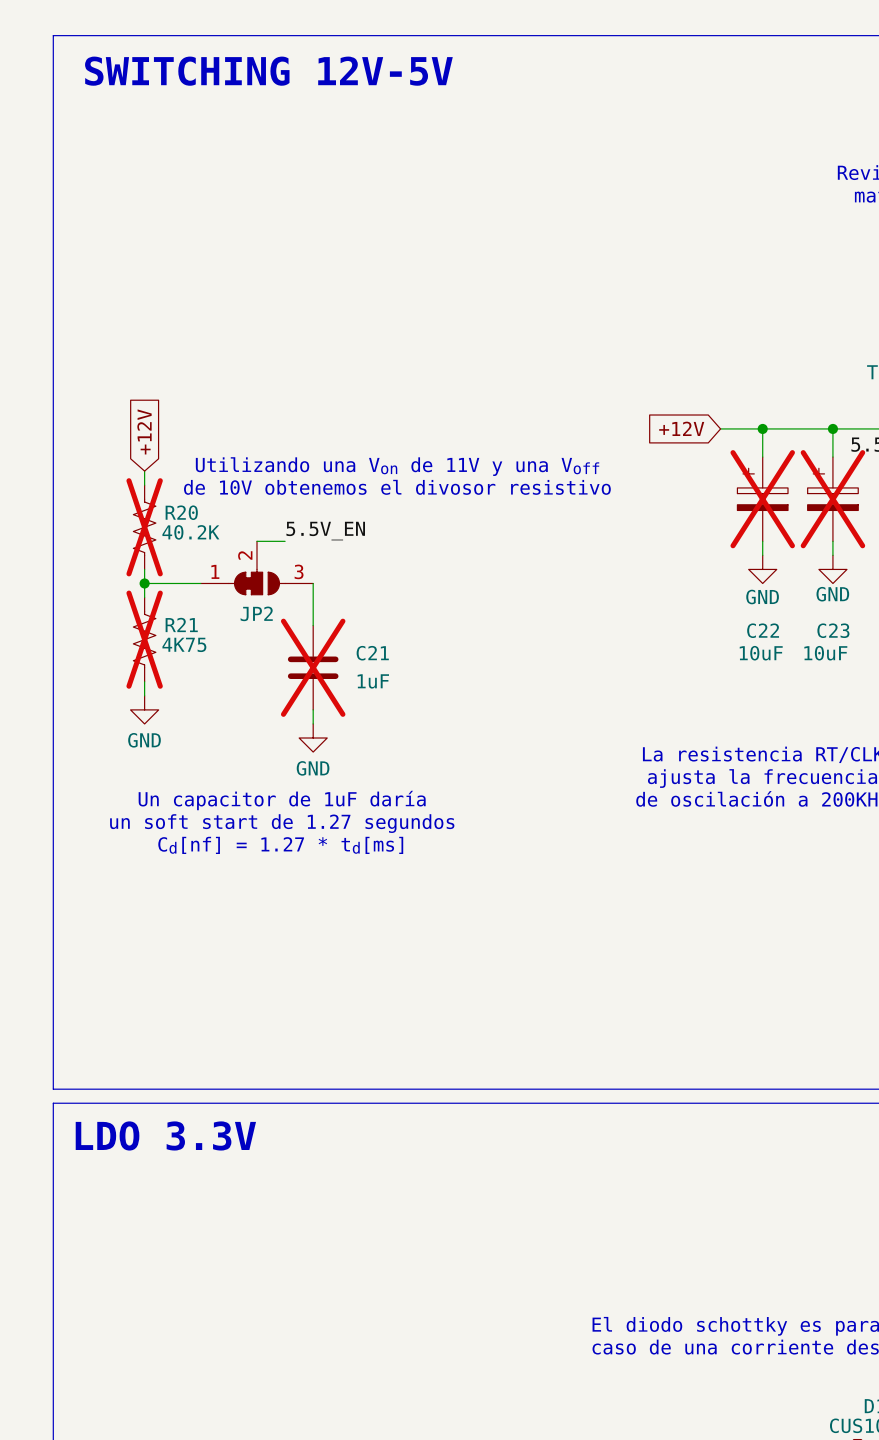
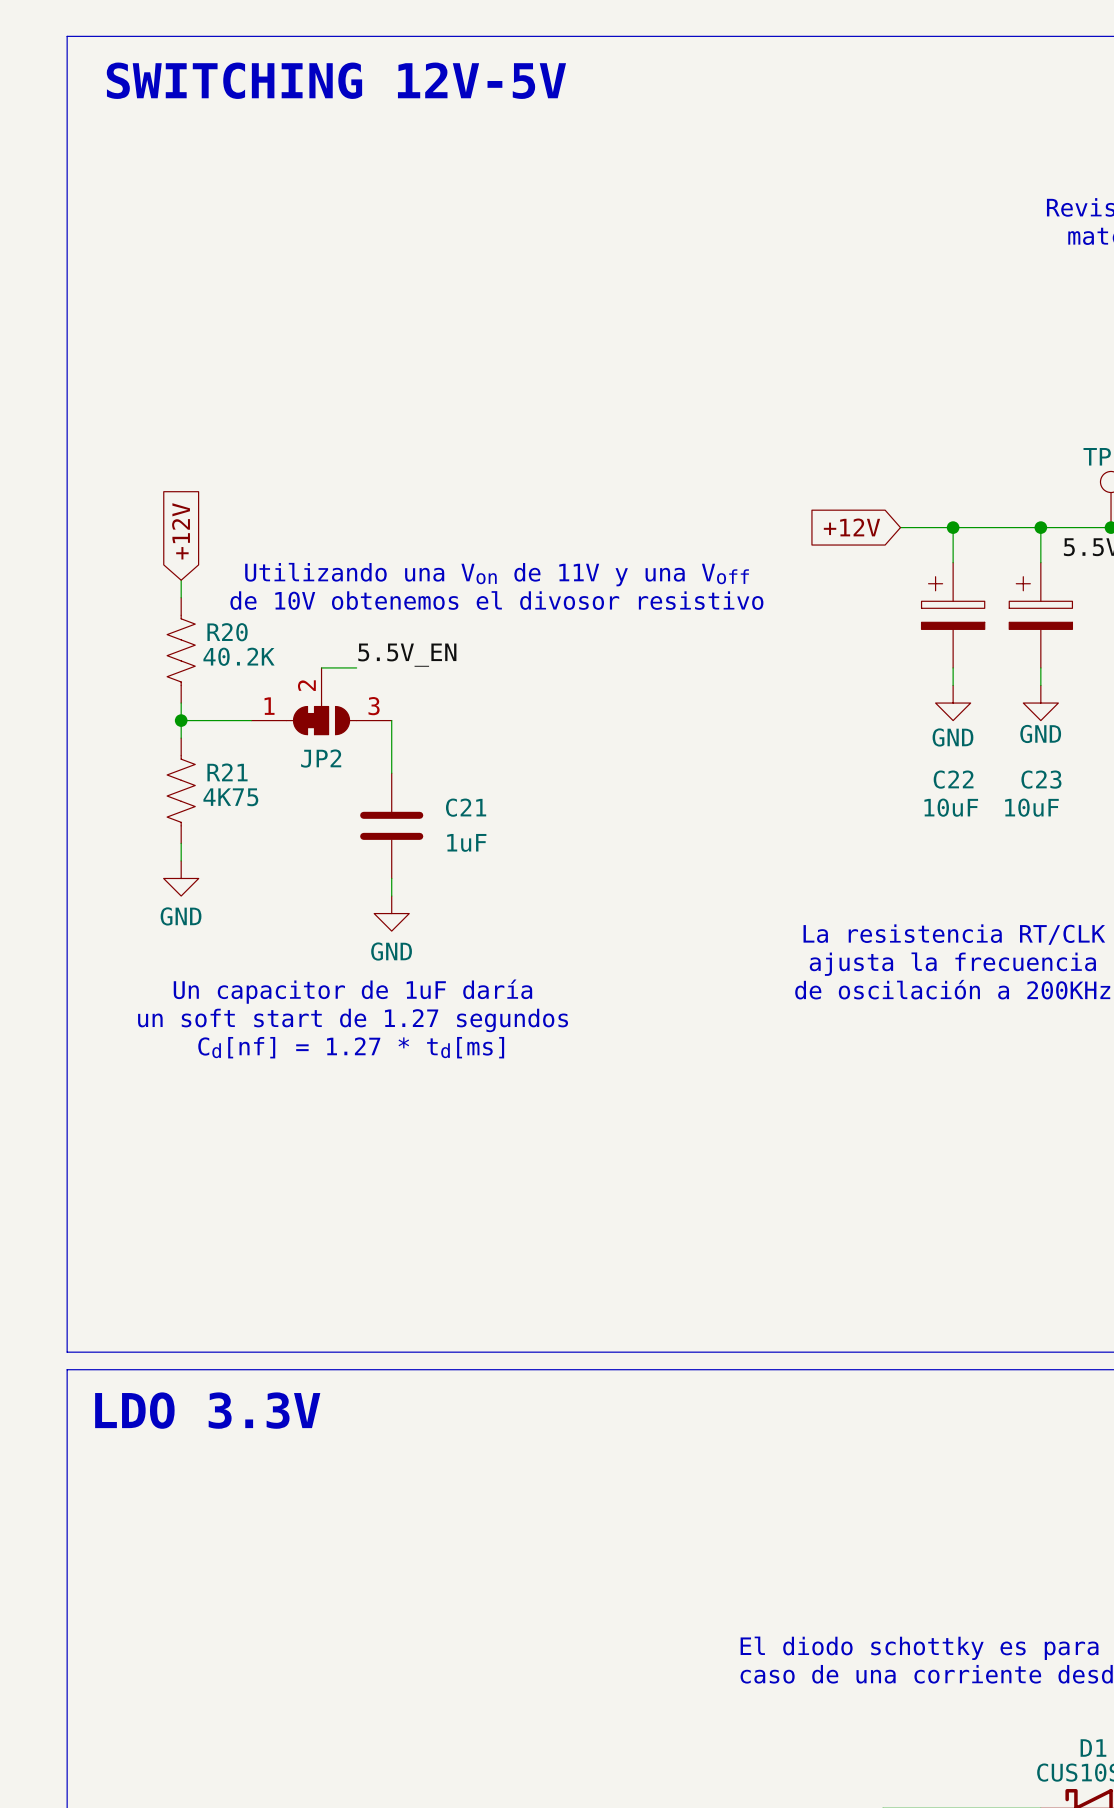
C22 do-not-place cross: (762, 499) -> none
C23 do-not-place cross: (832, 499) -> none
R20 do-not-place cross: (144, 527) -> none
R21 do-not-place cross: (144, 639) -> none
C21 do-not-place cross: (313, 667) -> none

